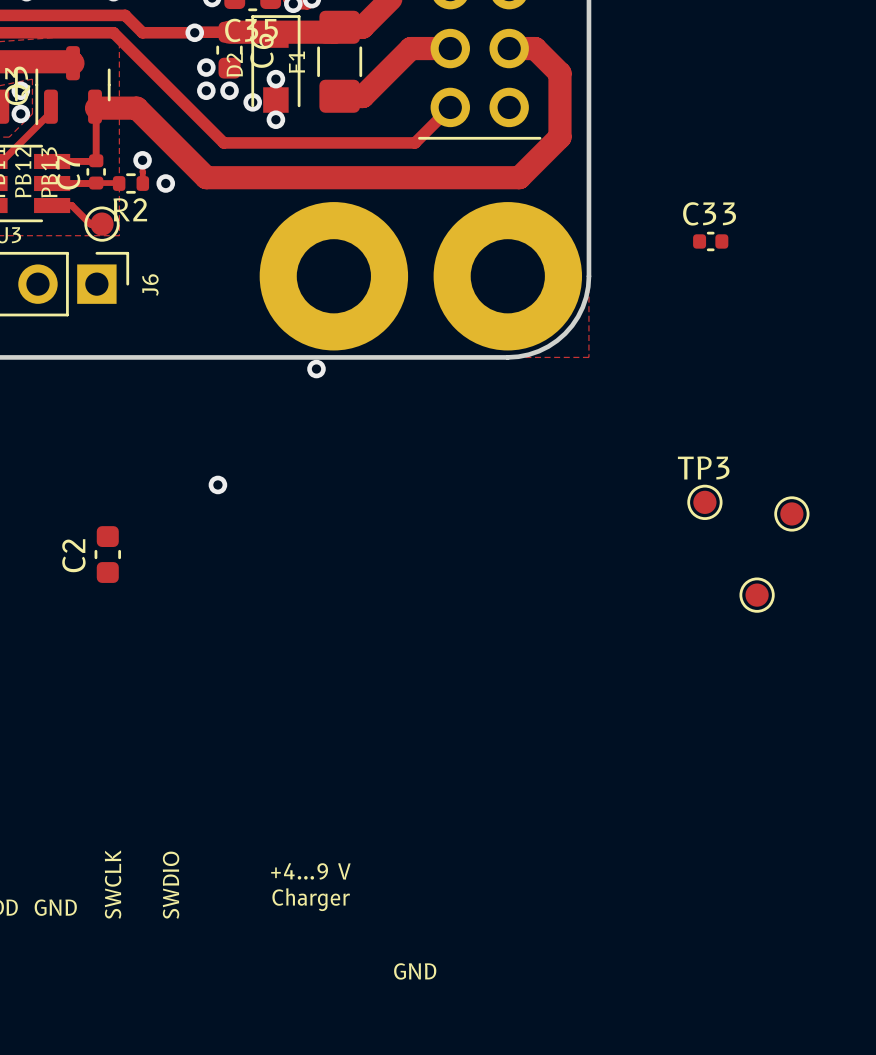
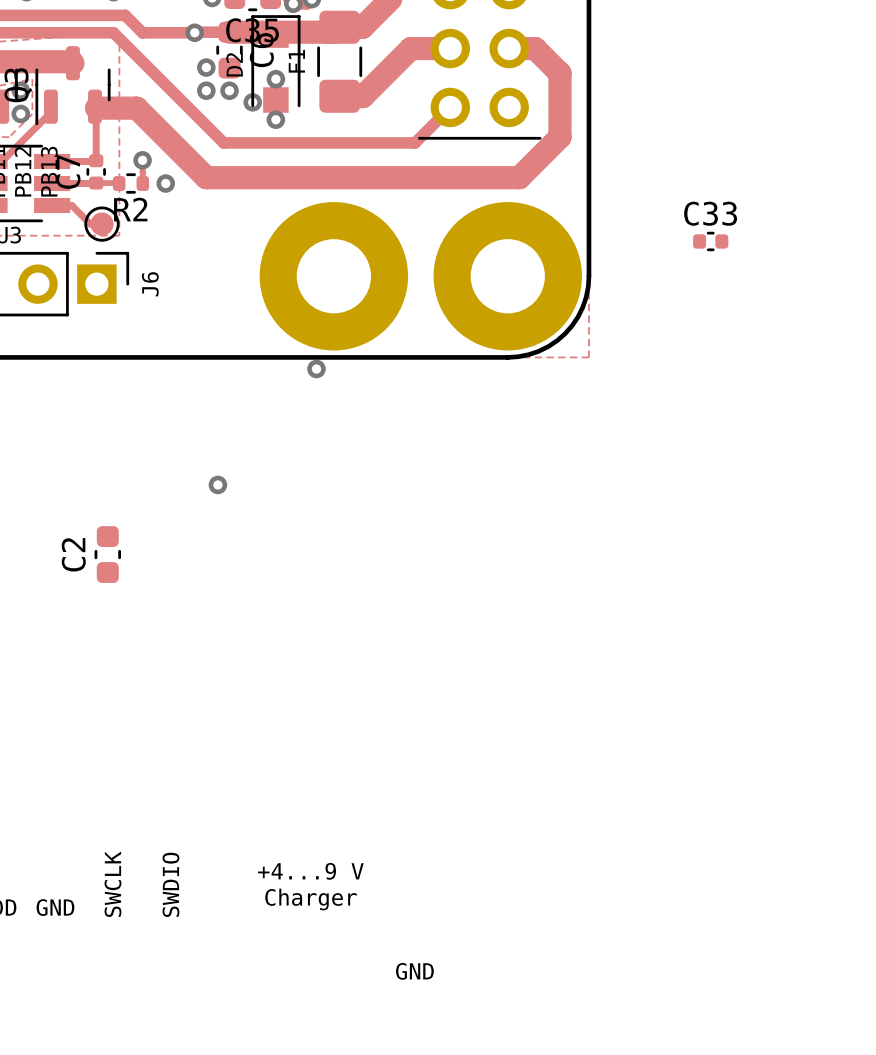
TP3: (704, 502) -> none
part: (791, 513) -> none
part: (757, 595) -> none

